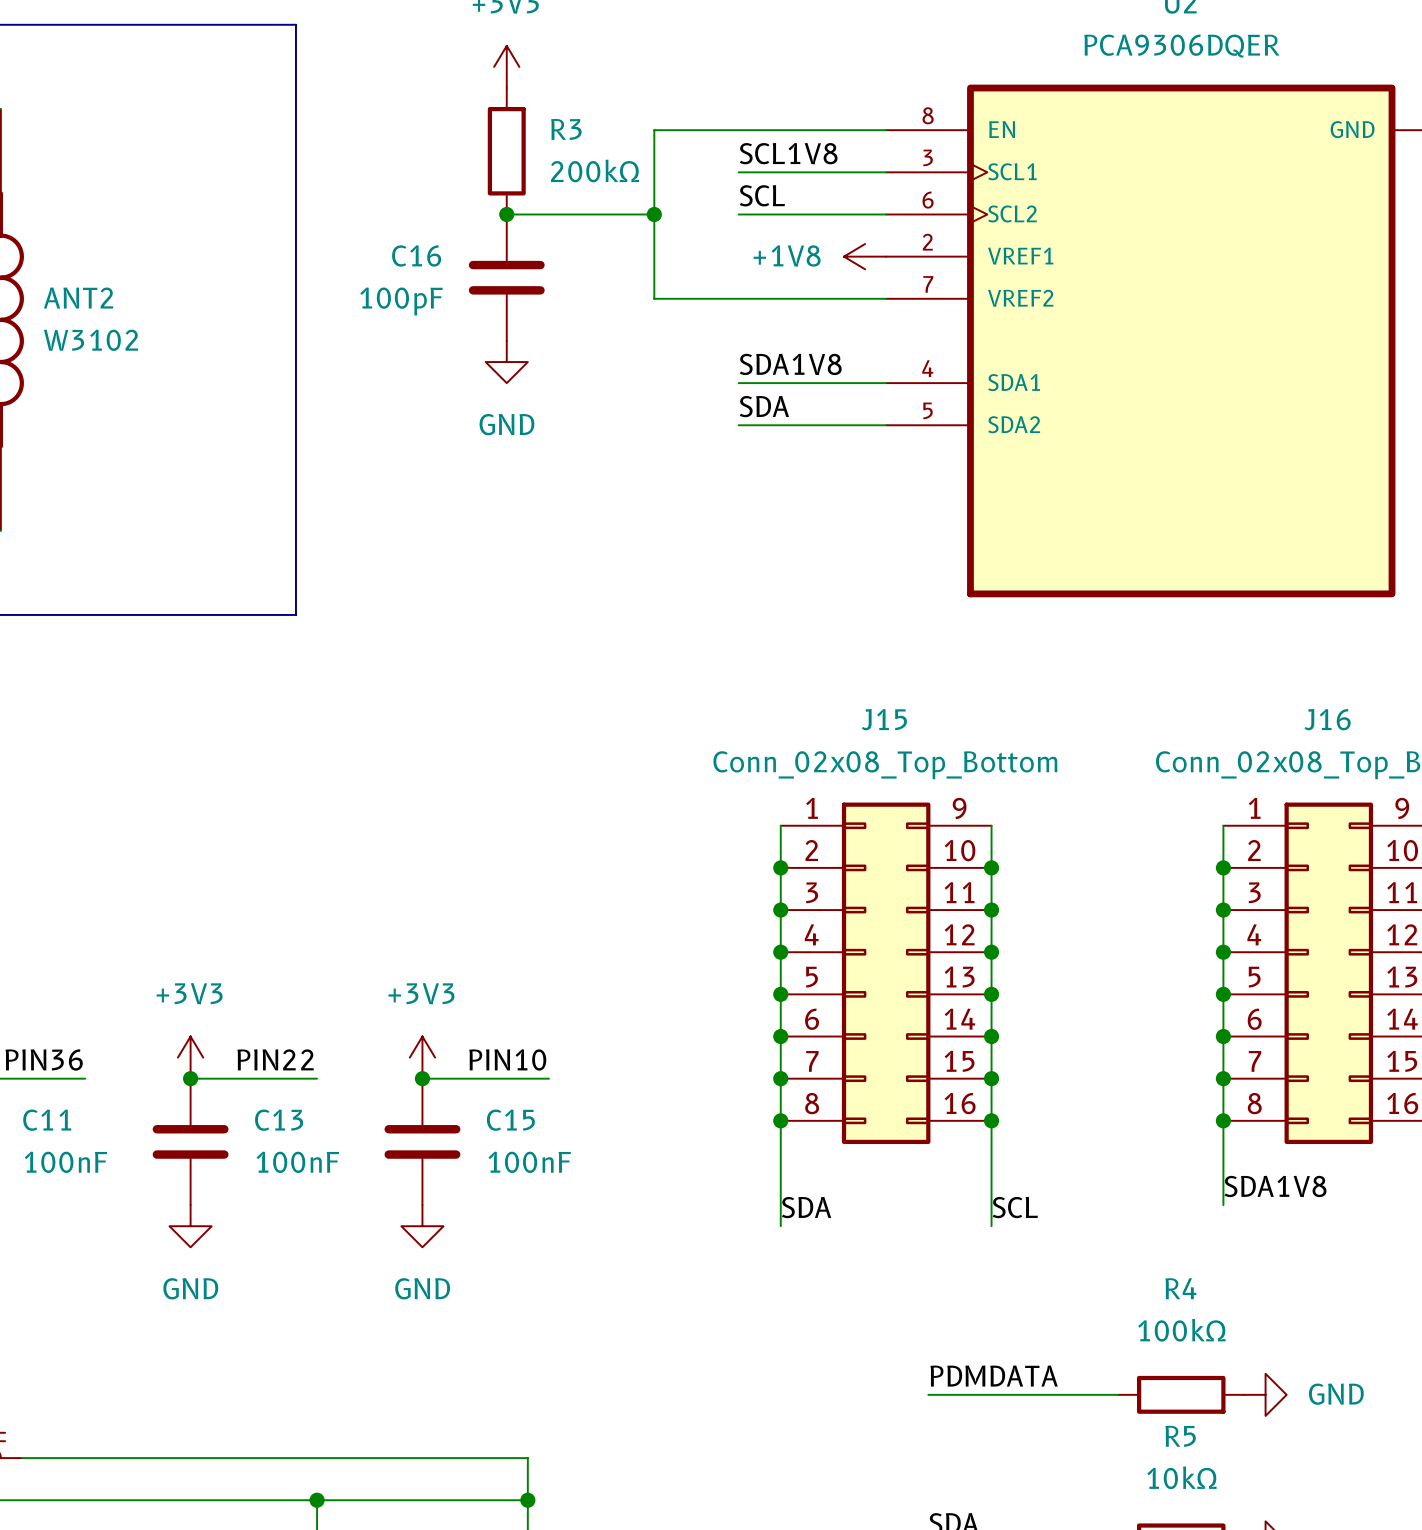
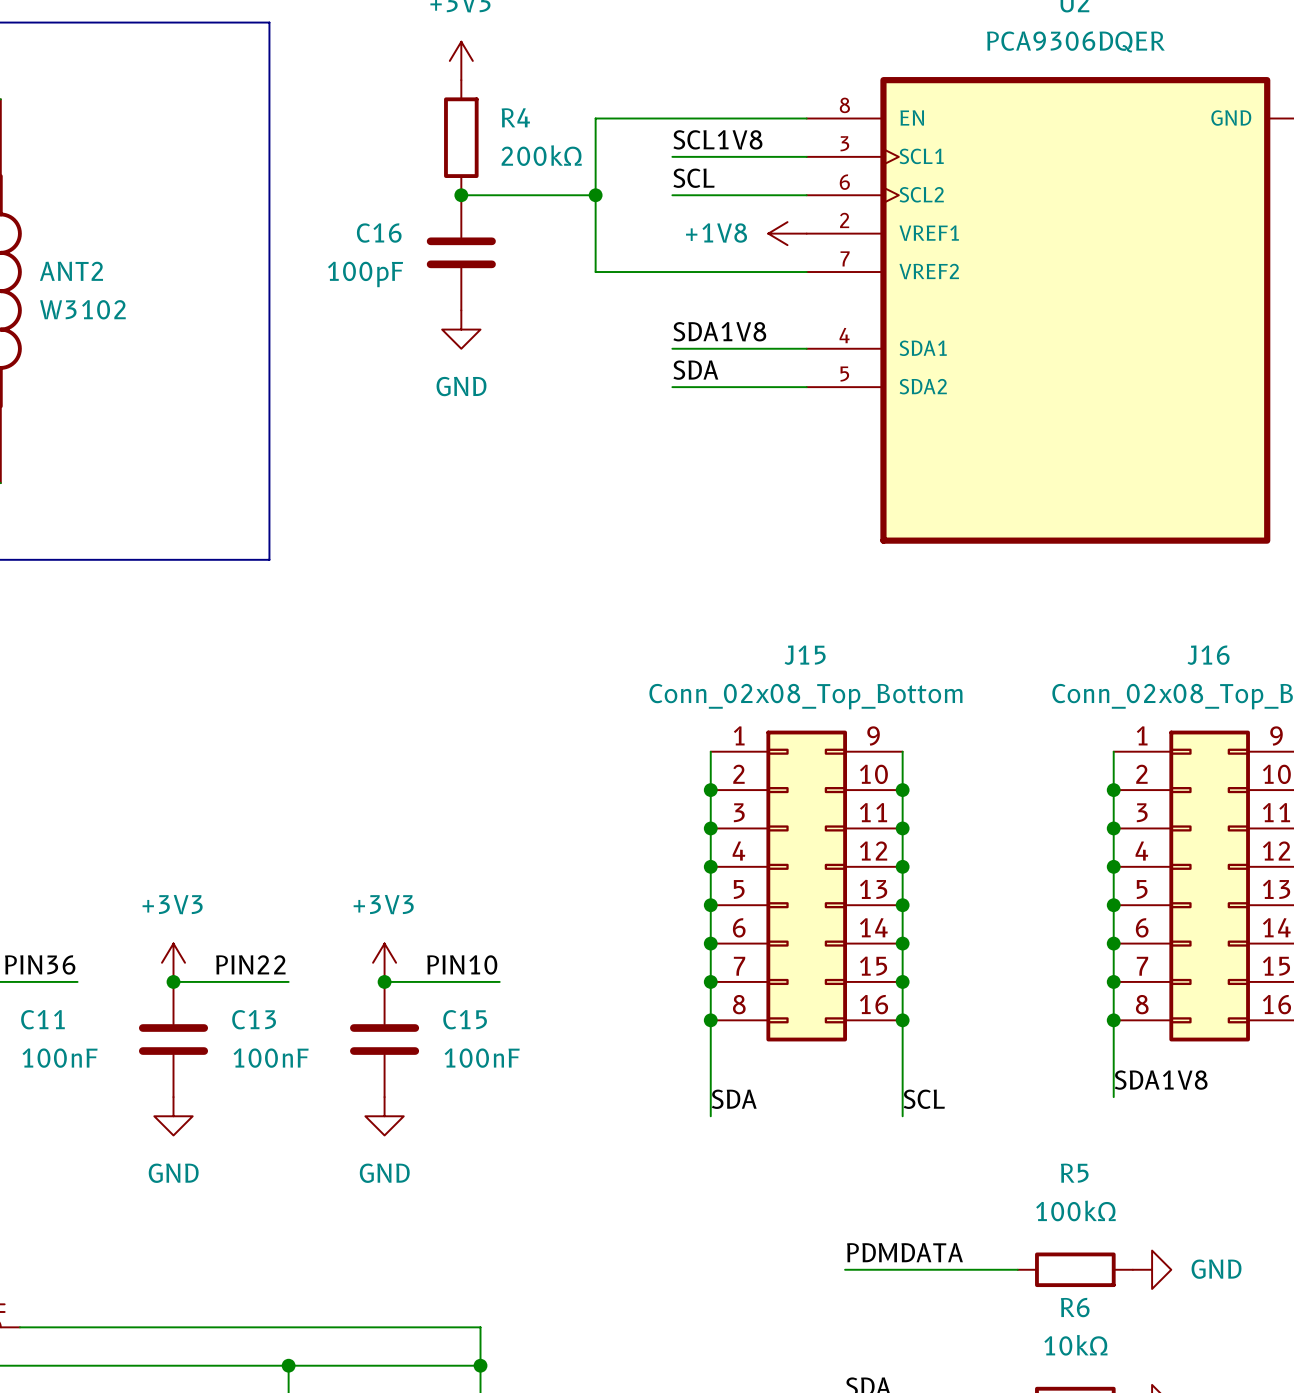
R3 name: R3 (566, 129) -> R4 (515, 117)
R4 name: R4 (1180, 1288) -> R5 (1074, 1173)
R5 name: R5 (1180, 1436) -> R6 (1075, 1307)

